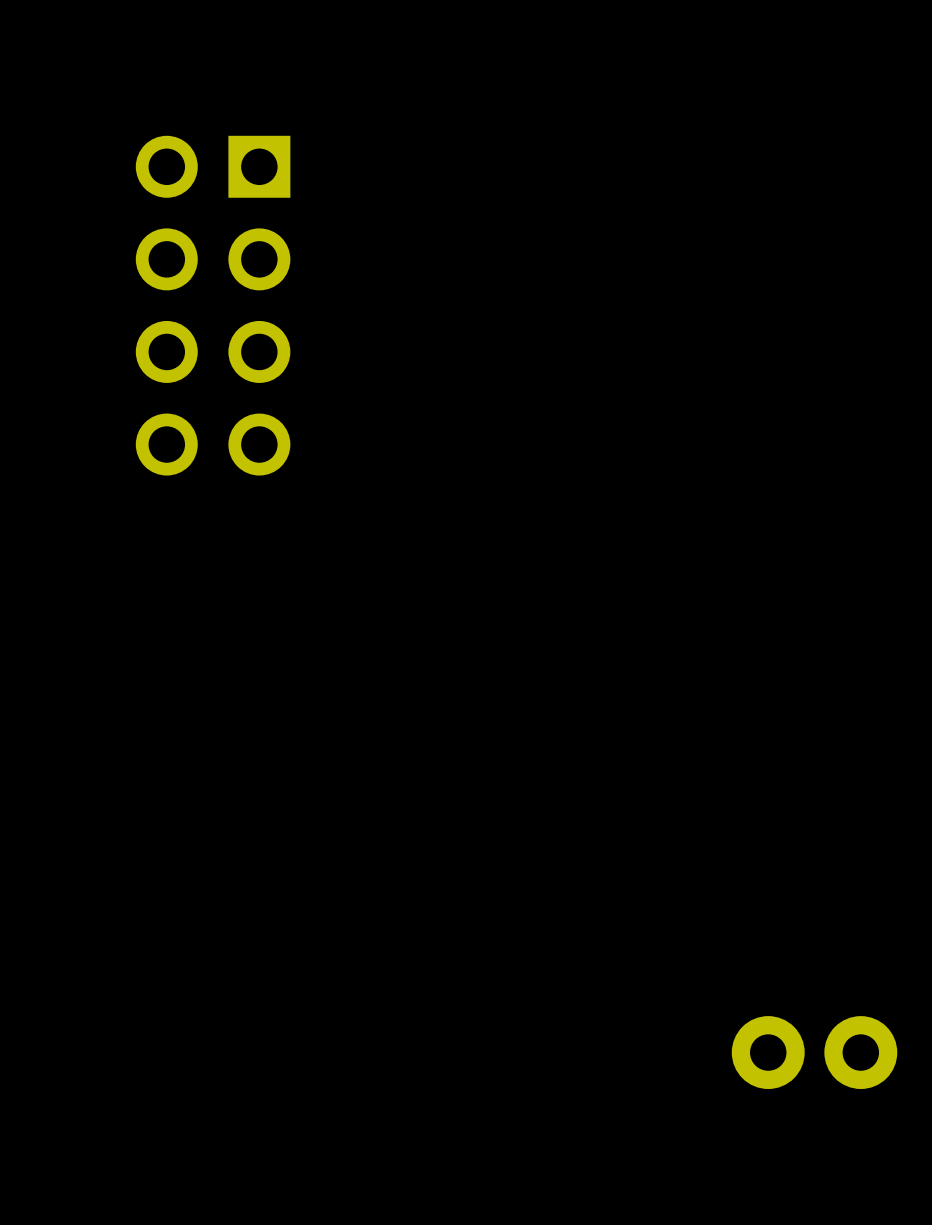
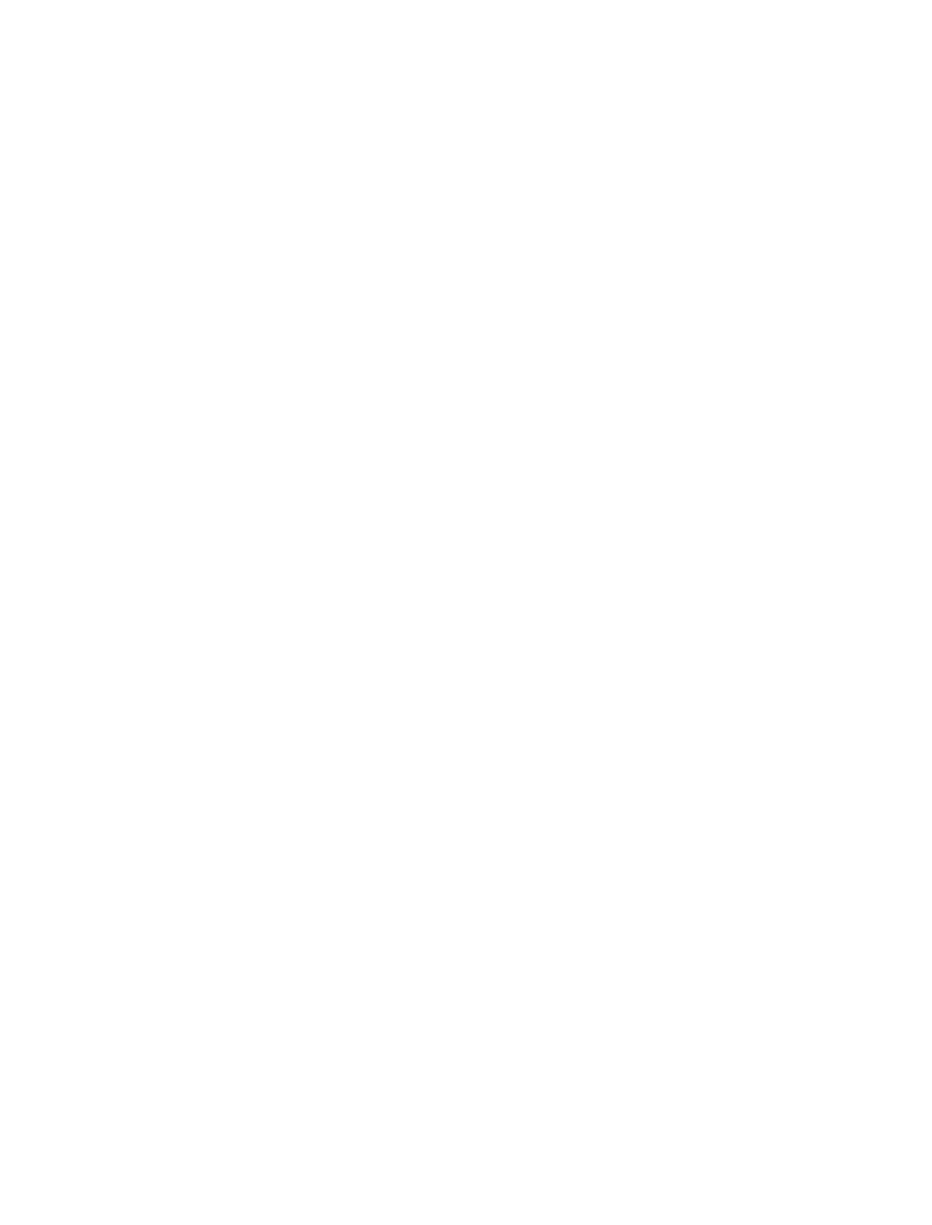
part: (213, 305) -> none
part: (814, 1052) -> none

